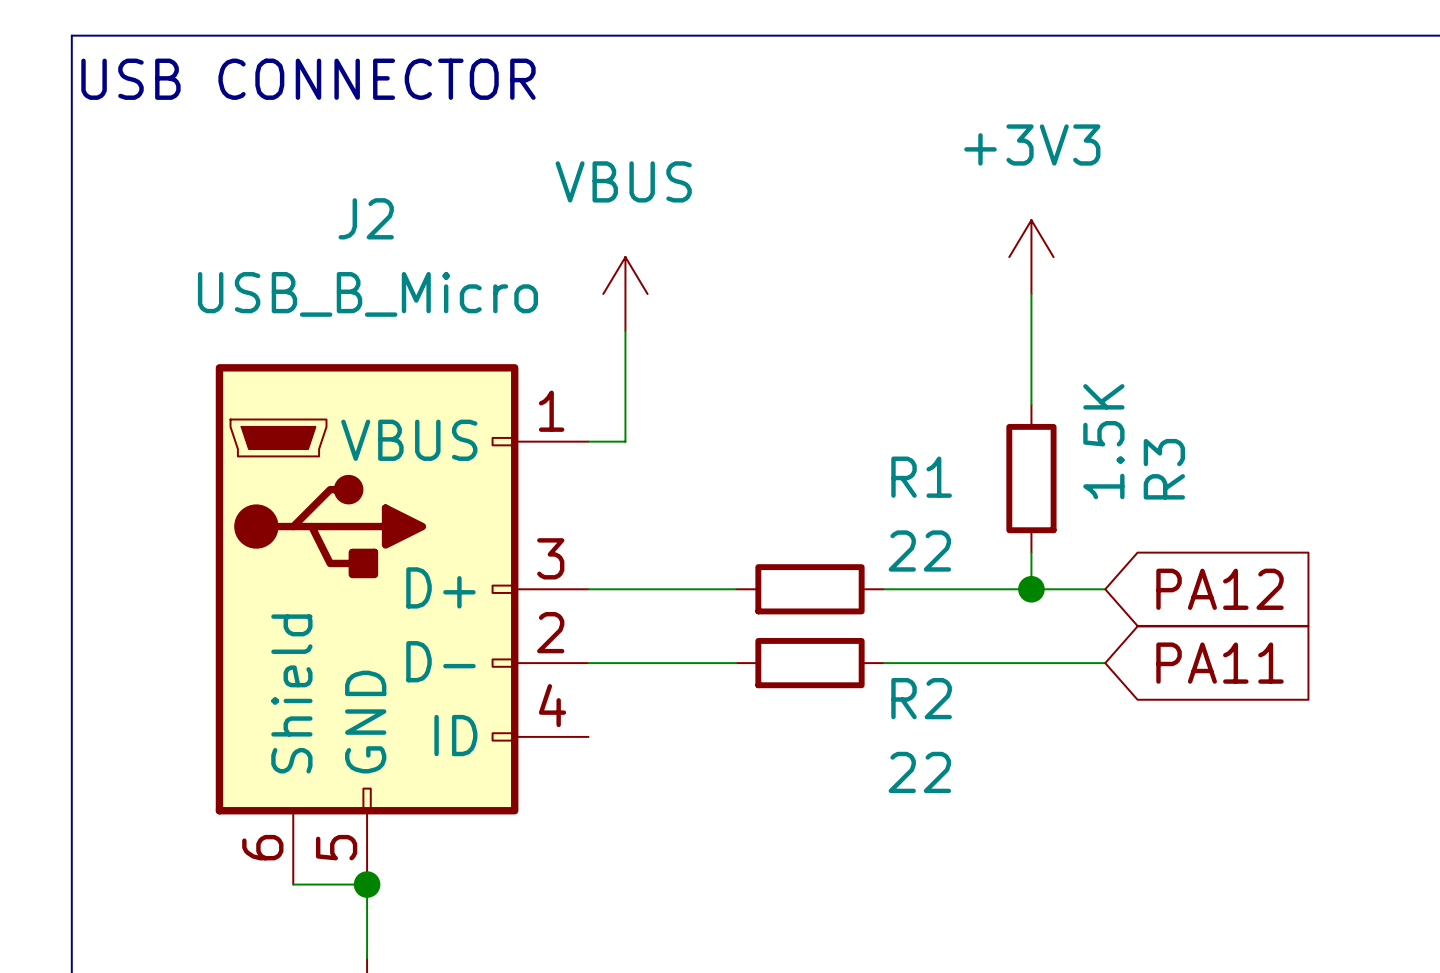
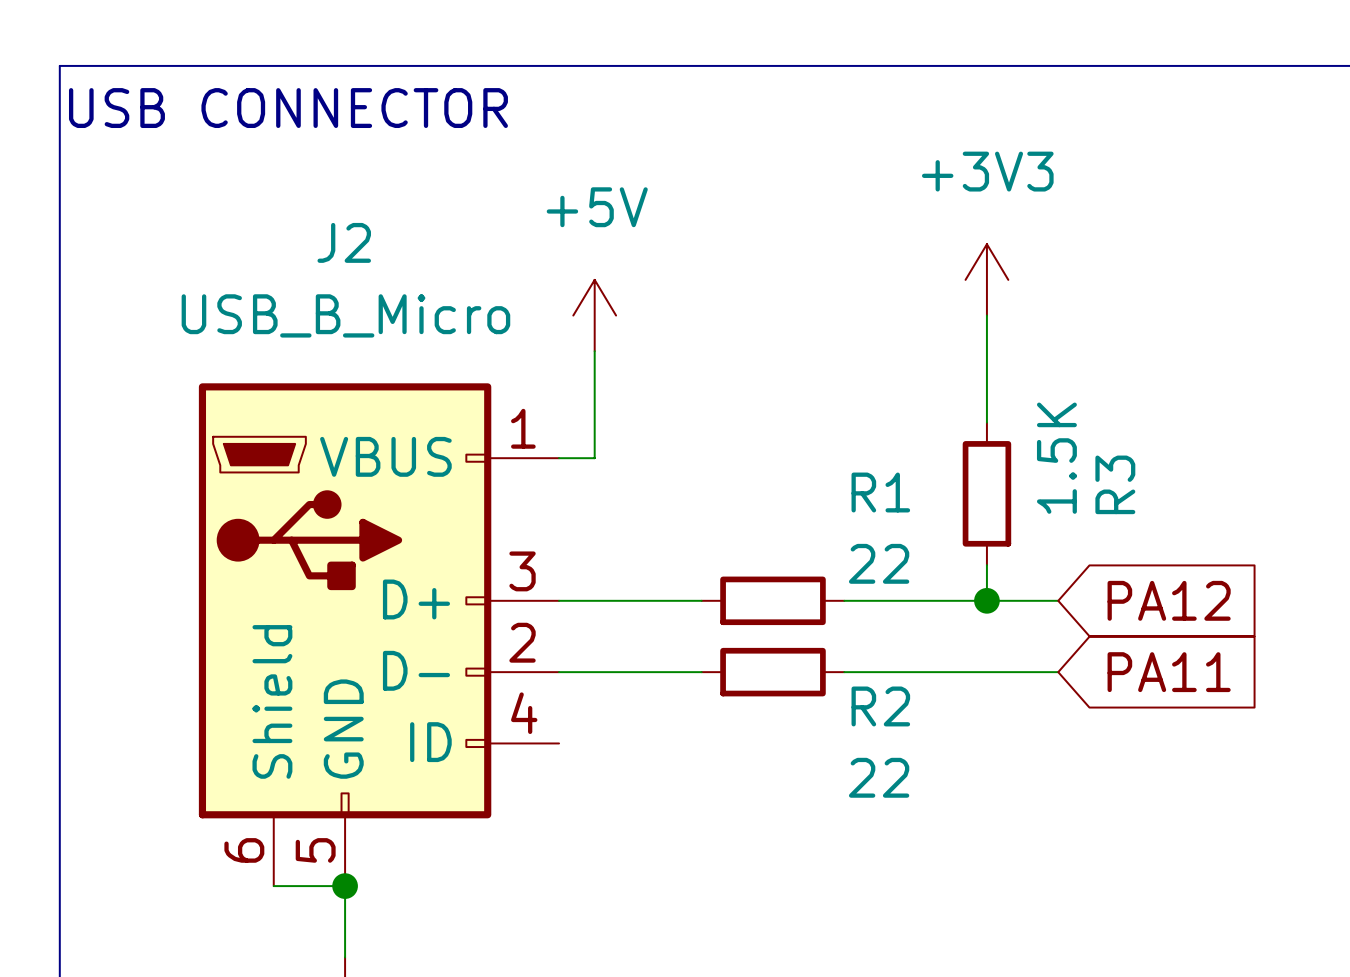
power symbol: VBUS (625, 294) -> +5V (594, 315)

